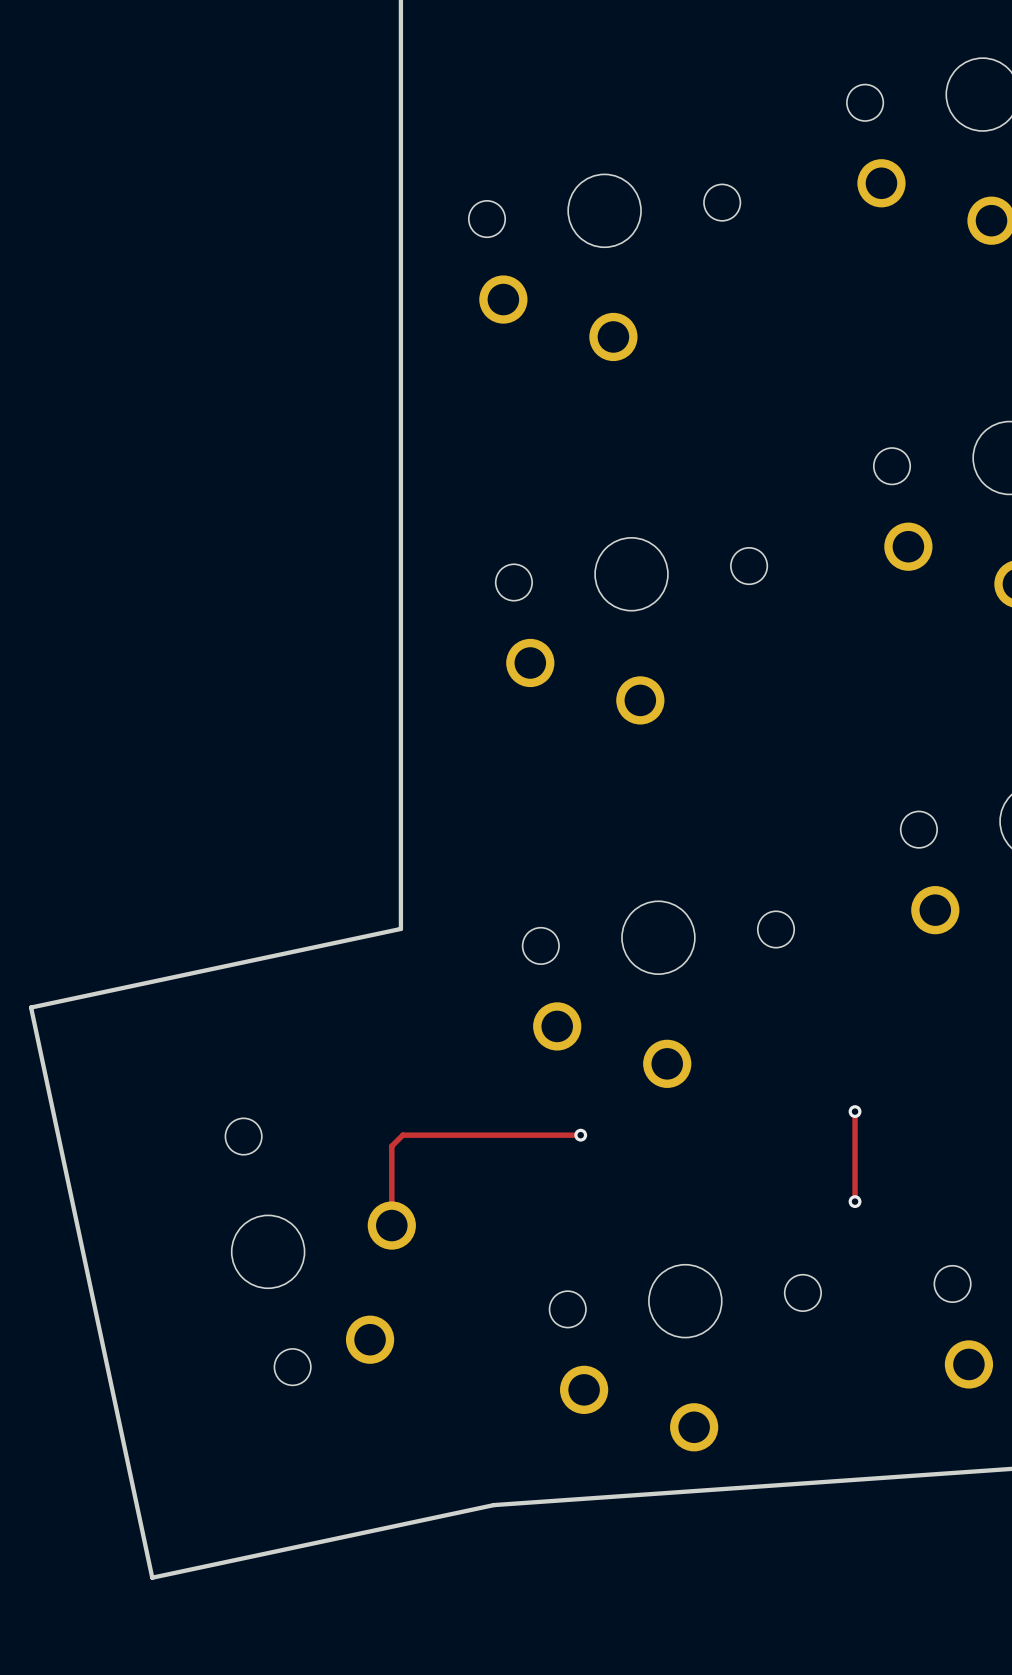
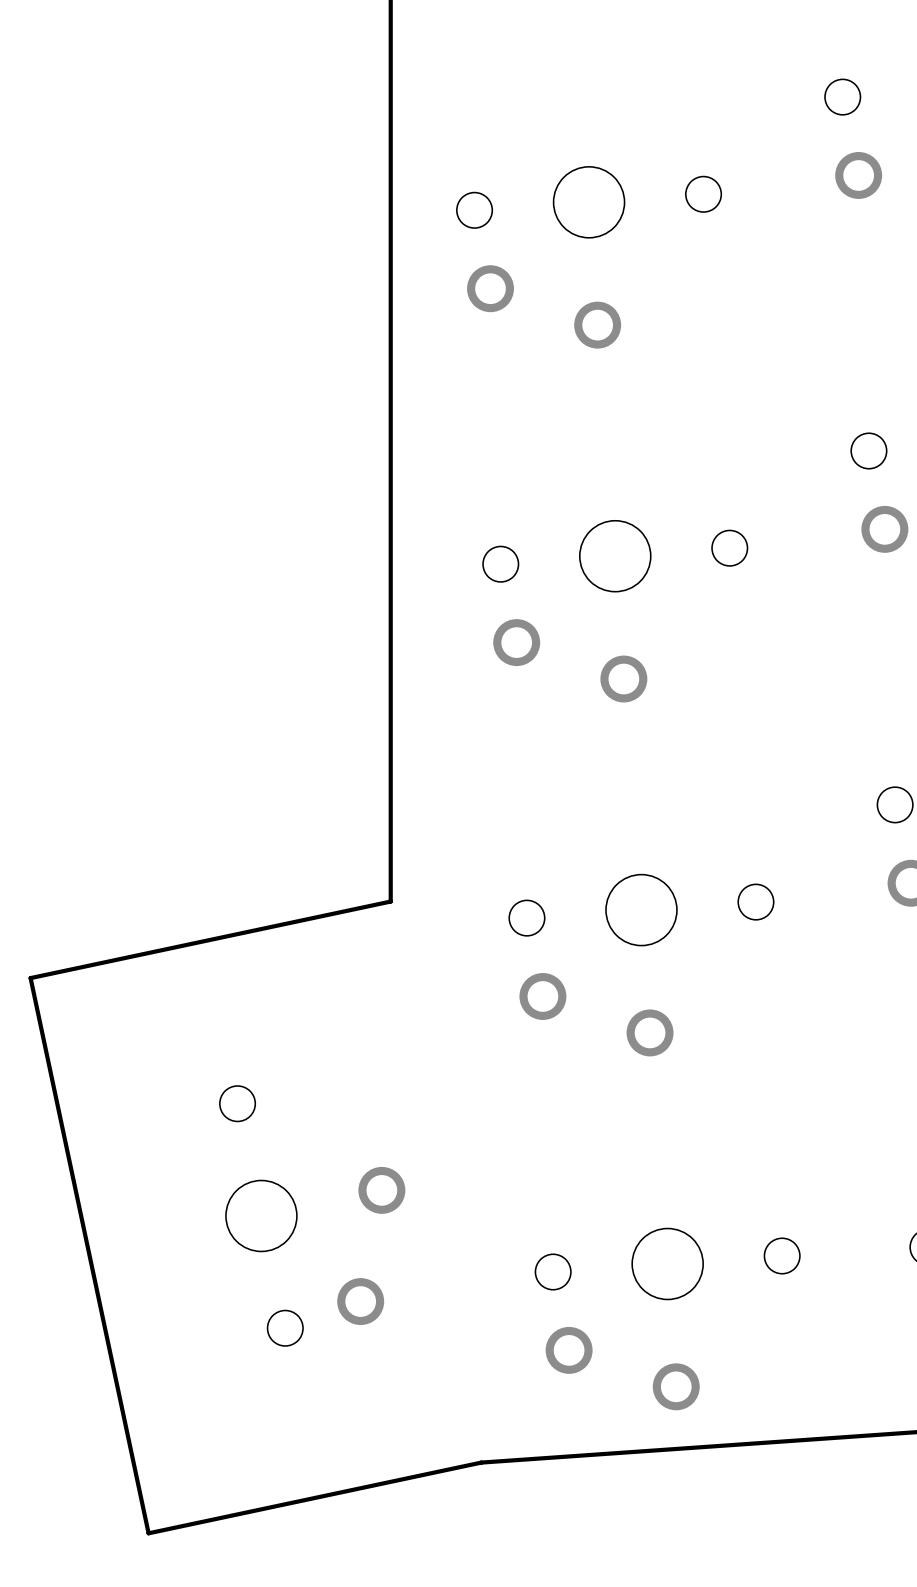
track: (855, 1109) (855, 1201) -> none
via: (855, 1111) -> none
track: (580, 1135) (402, 1135) (391, 1146) (391, 1225) -> none
via: (580, 1135) -> none
via: (855, 1201) -> none

